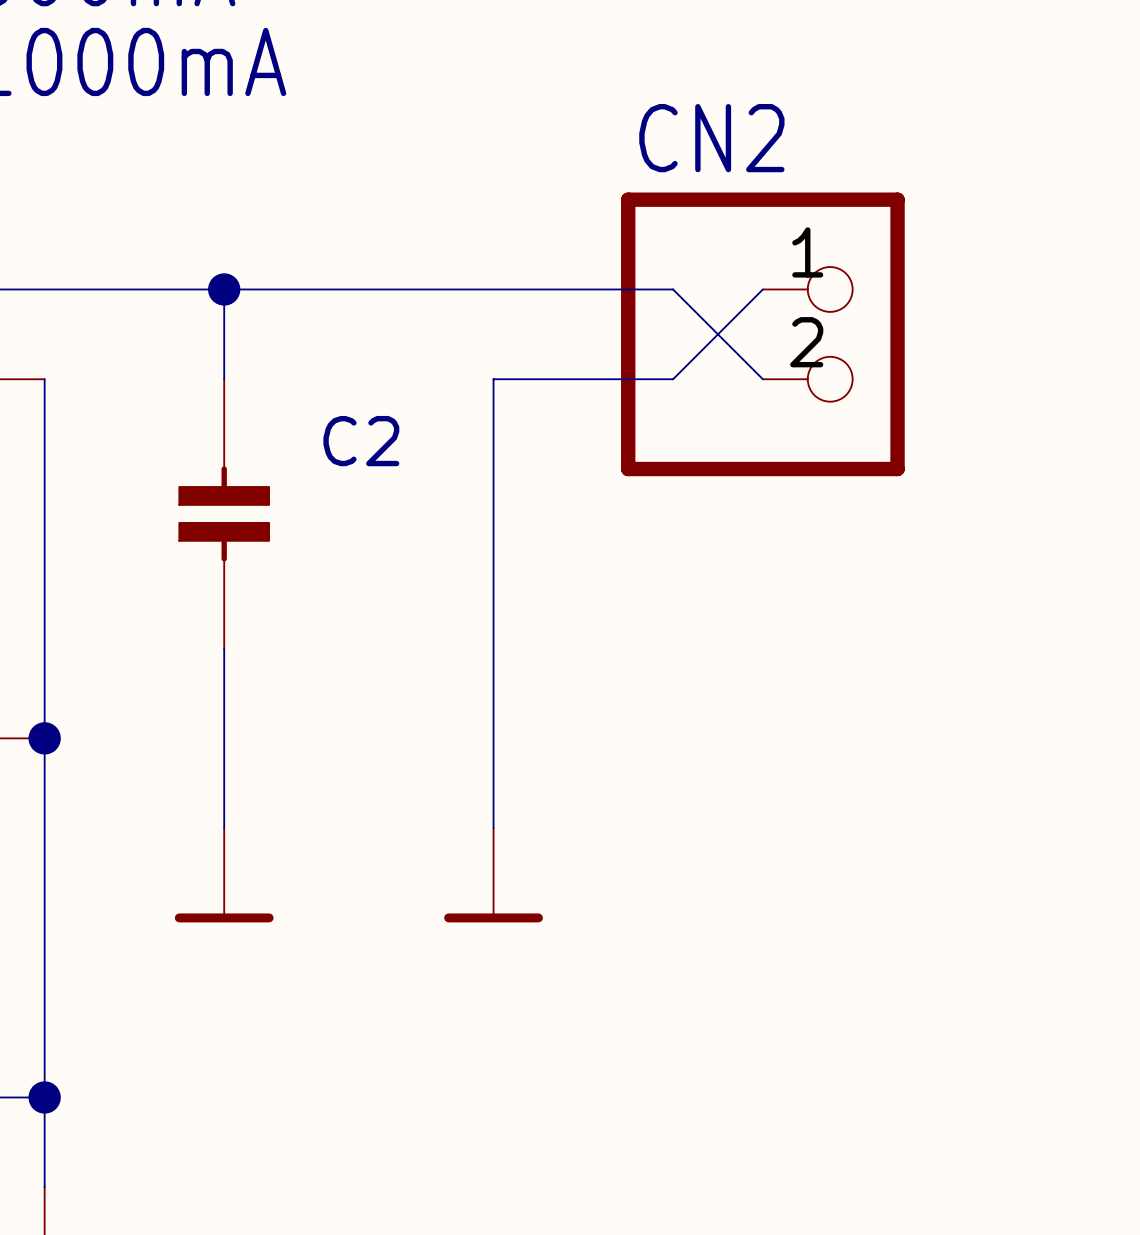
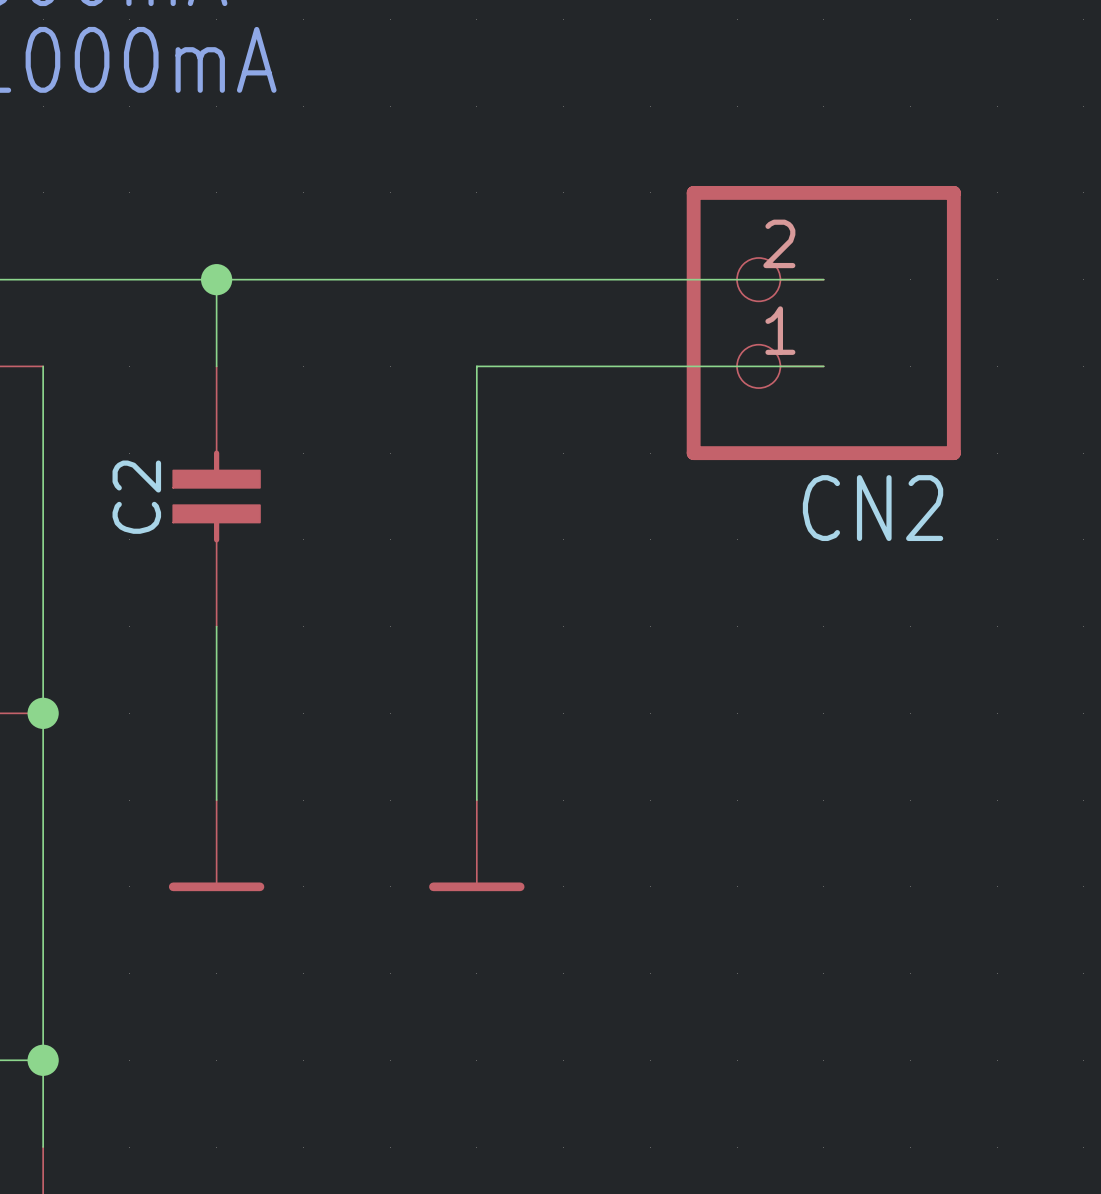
wire: (673, 289) (762, 379) -> (650, 279) (823, 279)
wire: (762, 289) (673, 379) -> (823, 366) (650, 366)
CN2 rotation: 0° (762, 334) -> 180° (823, 323)
C2 name rotation: 0° (361, 441) -> 90° counterclockwise (136, 497)
C2 name position: C2 (361, 441) -> C2 (136, 497)

